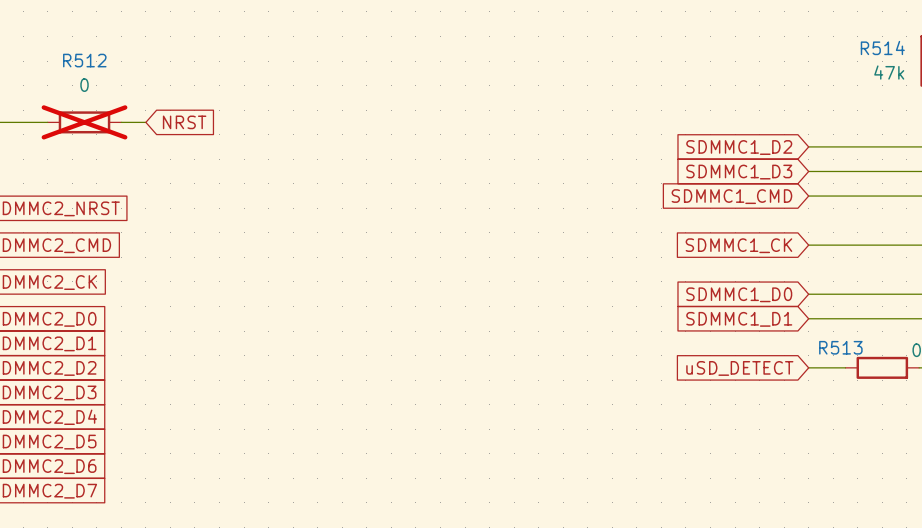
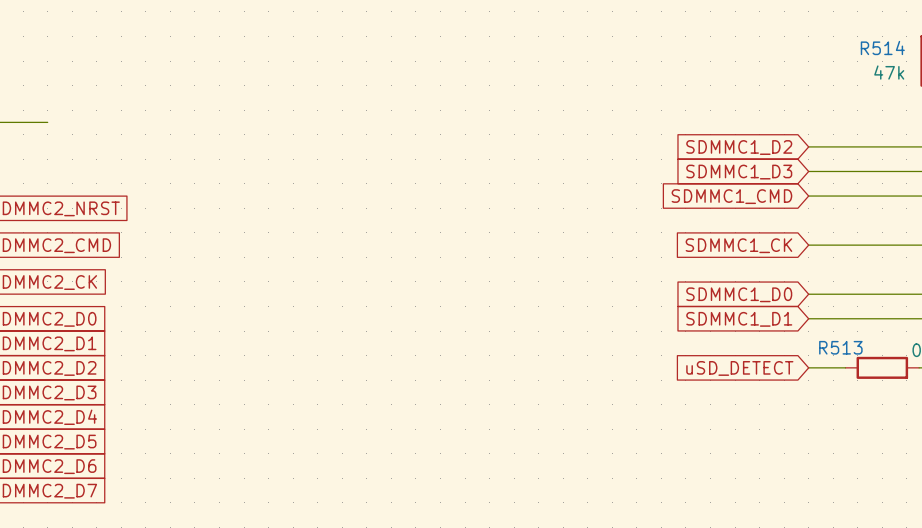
R512: 0 (84, 122) -> none
wire: (121, 122) (145, 122) -> none
global label: NRST (184, 122) -> none

